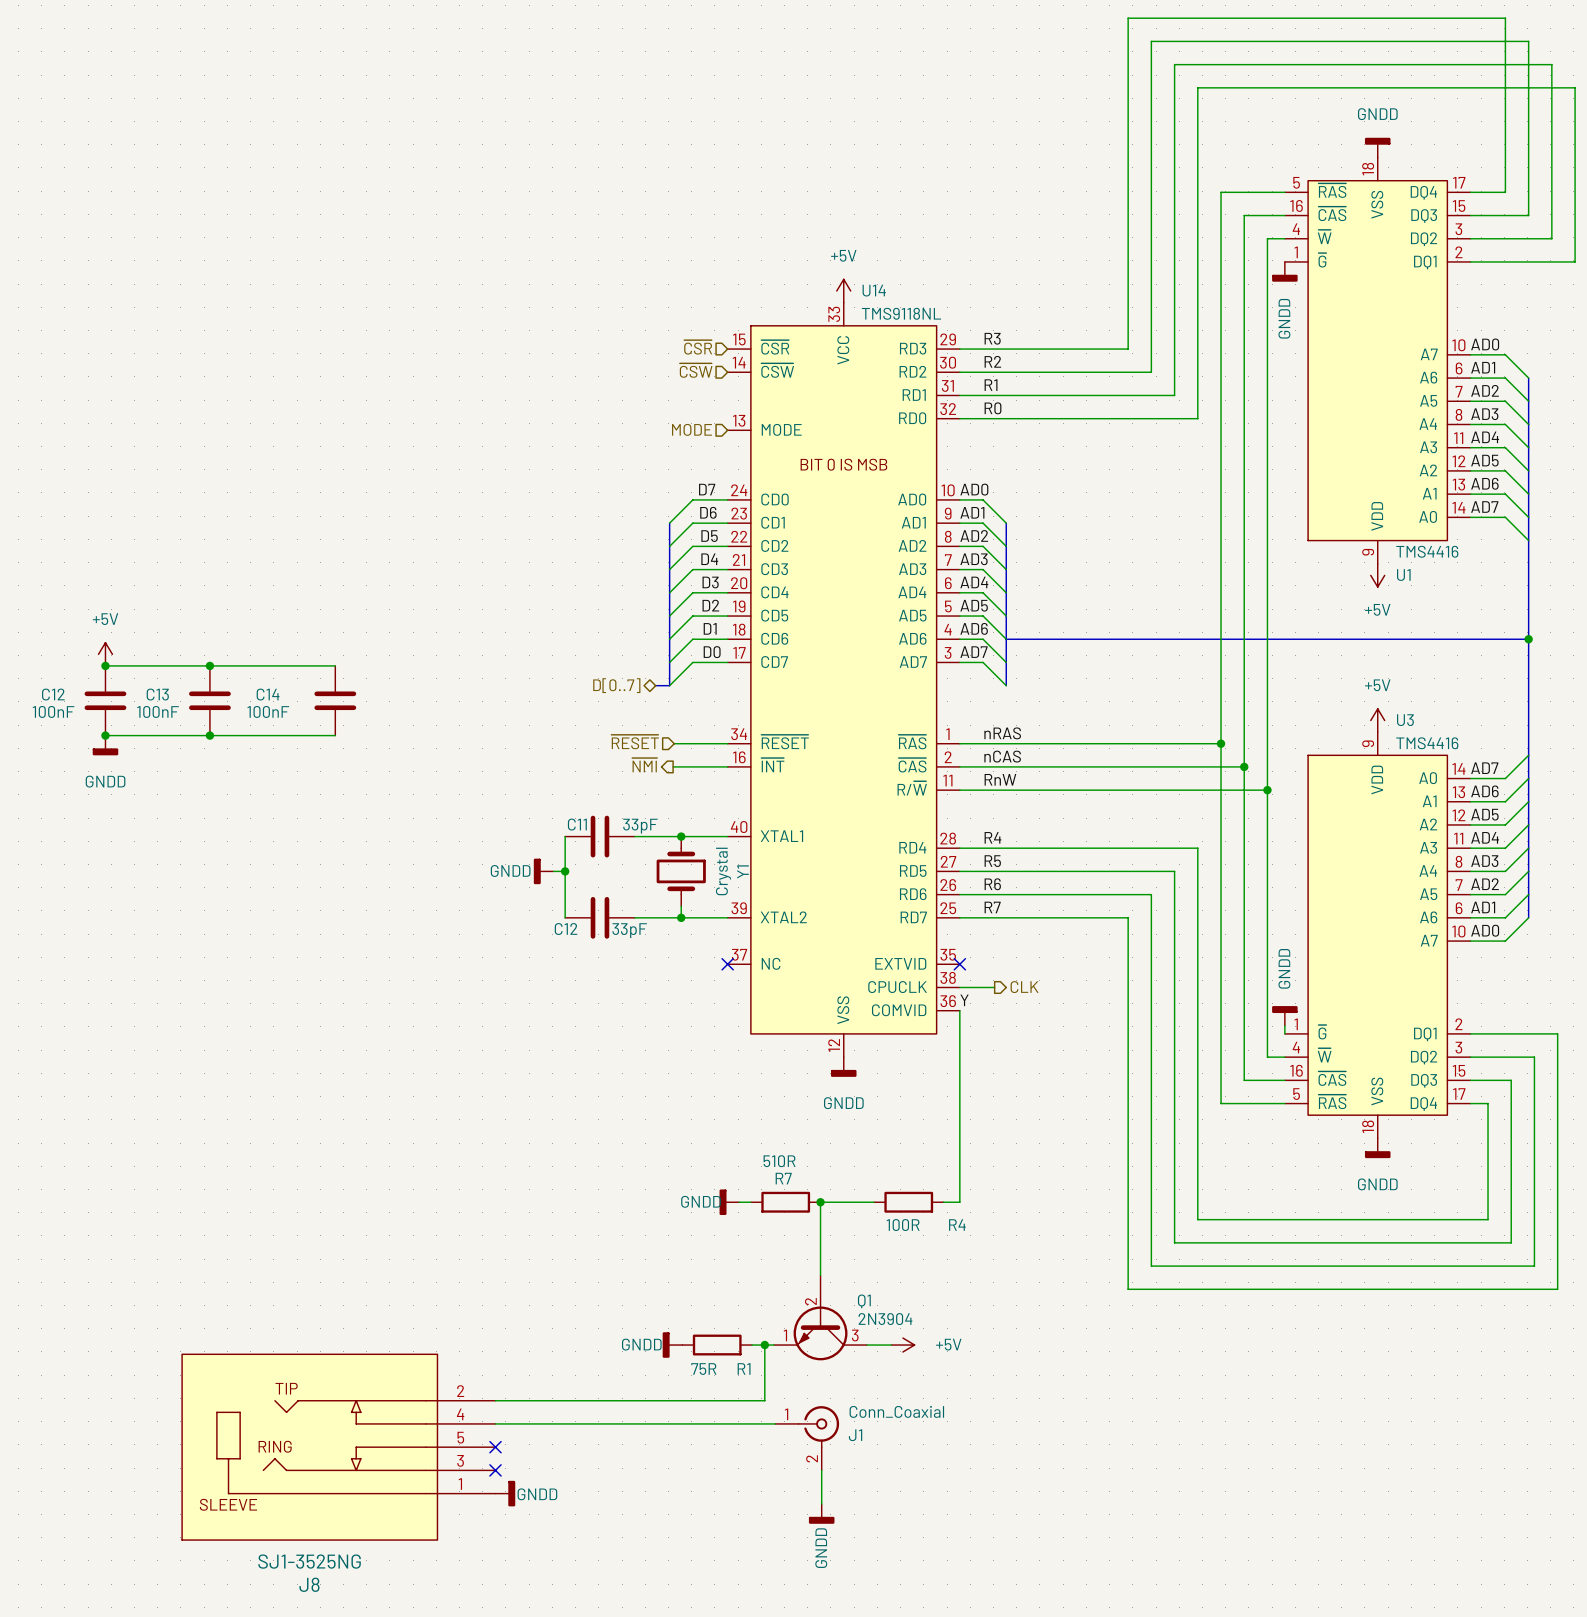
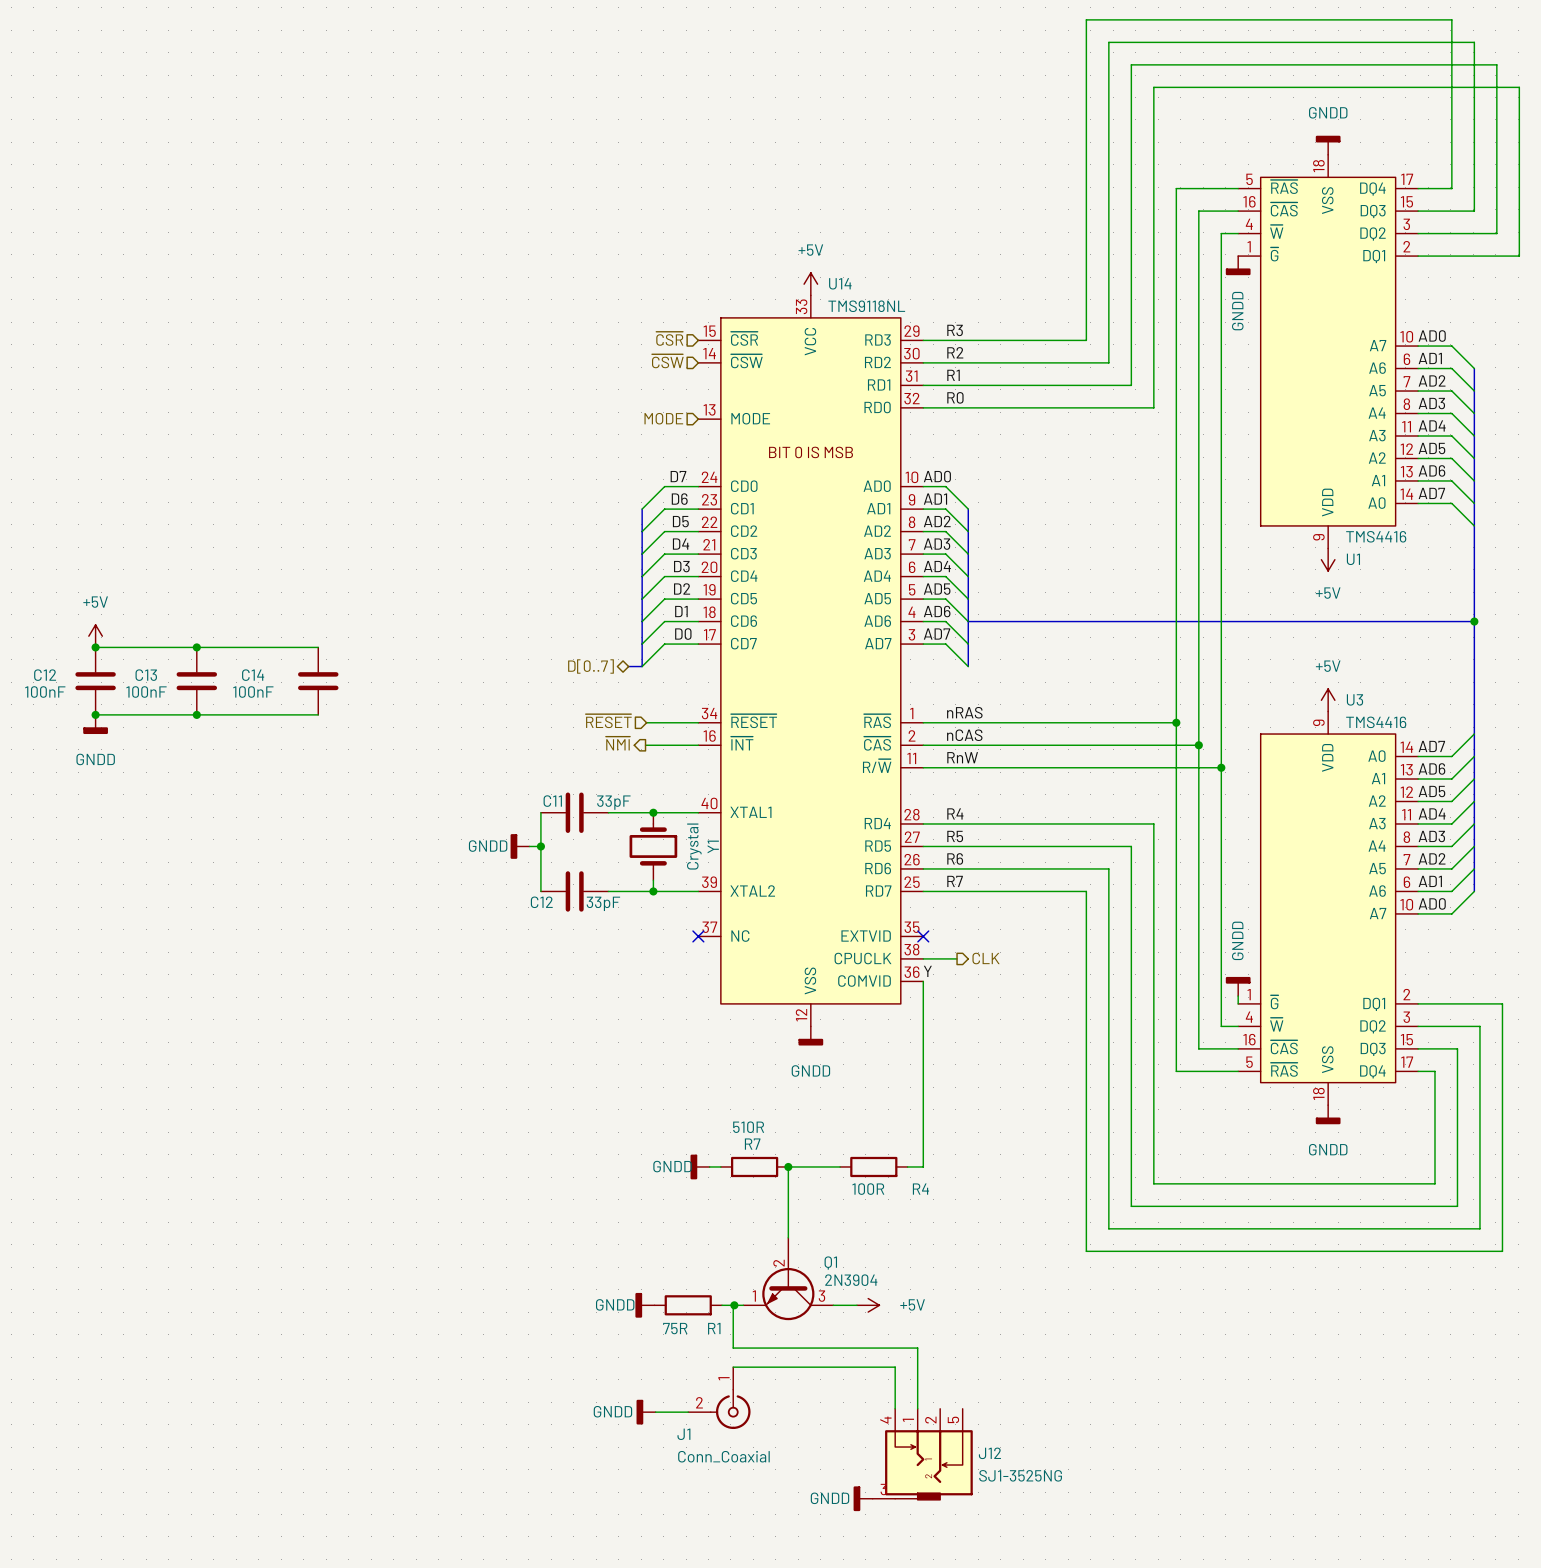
wire: none -> (733, 1305) (733, 1348) (917, 1348) (917, 1408)
wire: (764, 1345) (764, 1400) (495, 1400) -> none
wire: none -> (733, 1367) (895, 1367) (895, 1408)
J1 value position: Conn_Coaxial (896, 1411) -> Conn_Coaxial (723, 1456)
wire: (495, 1423) (775, 1423) -> none
J1 rotation: 0° (818, 1426) -> 90° clockwise (730, 1409)
J1 name position: J1 (855, 1435) -> J1 (683, 1434)
J1 position: (807, 1438) -> (719, 1398)
J8: SJ1-3525NG (338, 1447) -> none
no-connect mark: (495, 1447) -> none
power symbol: none -> GNDD (646, 1412)
wire: none -> (655, 1412) (688, 1412)
no-connect mark: (495, 1470) -> none
wire: (821, 1470) (821, 1504) -> none
power symbol: GNDD (505, 1493) -> none
J12: none -> SJ1-3525NG (922, 1454)
power symbol: GNDD (821, 1513) -> none
power symbol: none -> GNDD (863, 1498)

